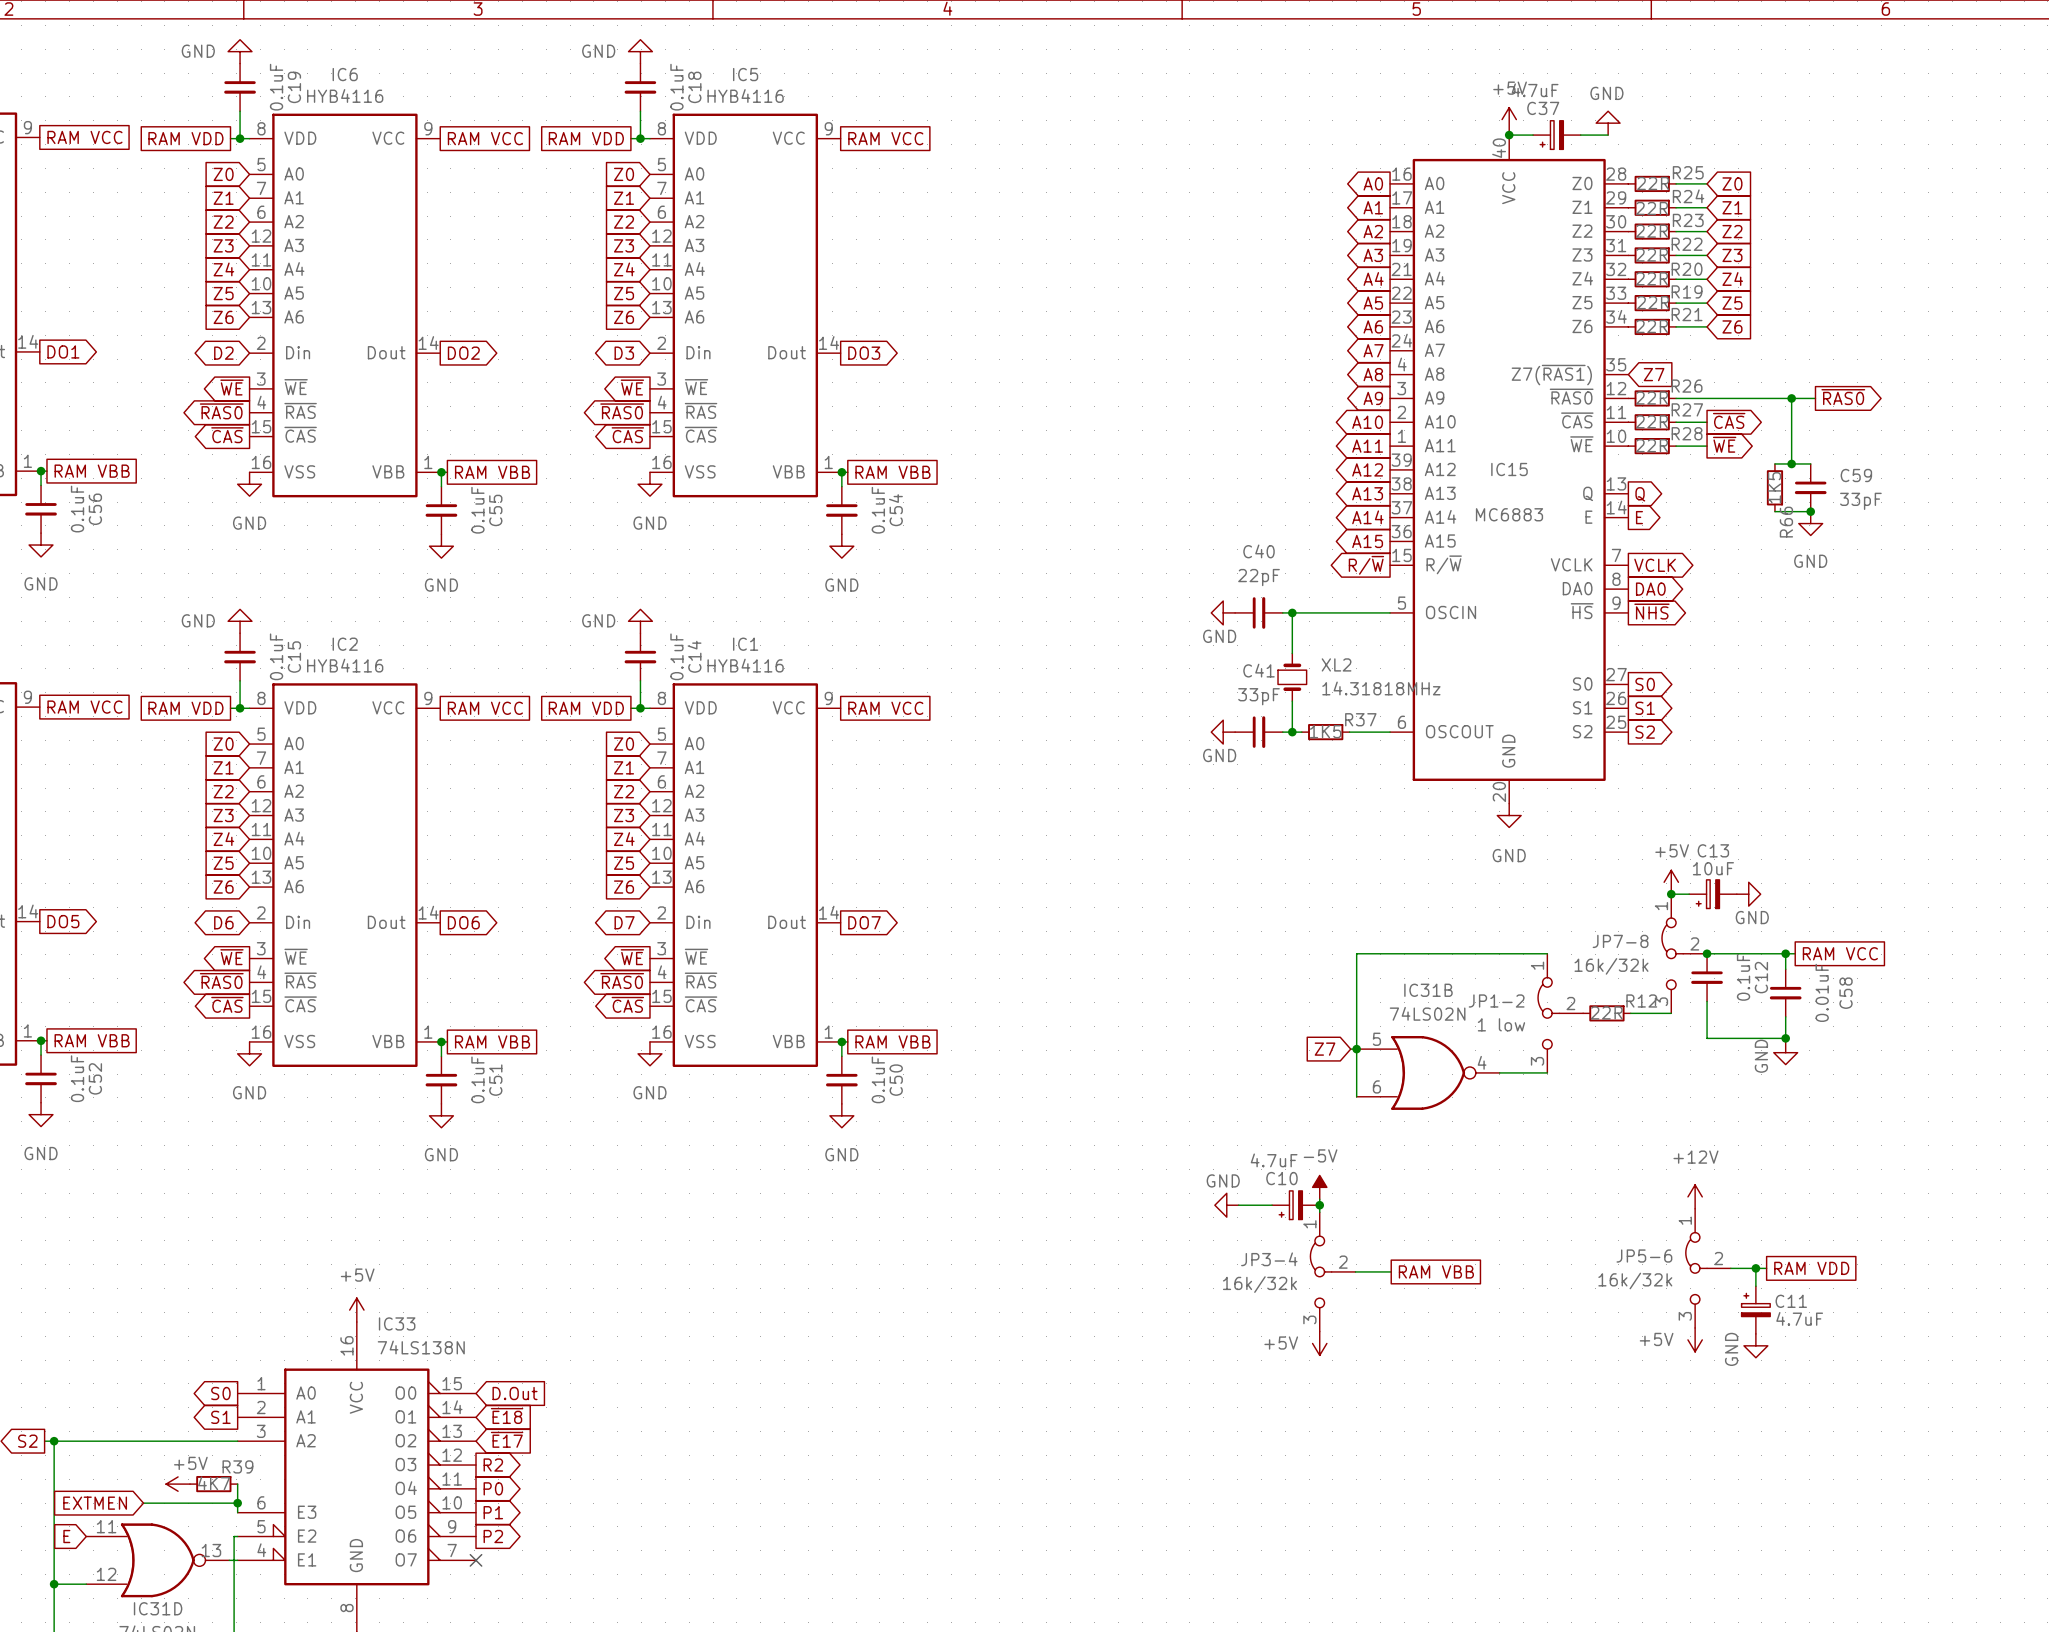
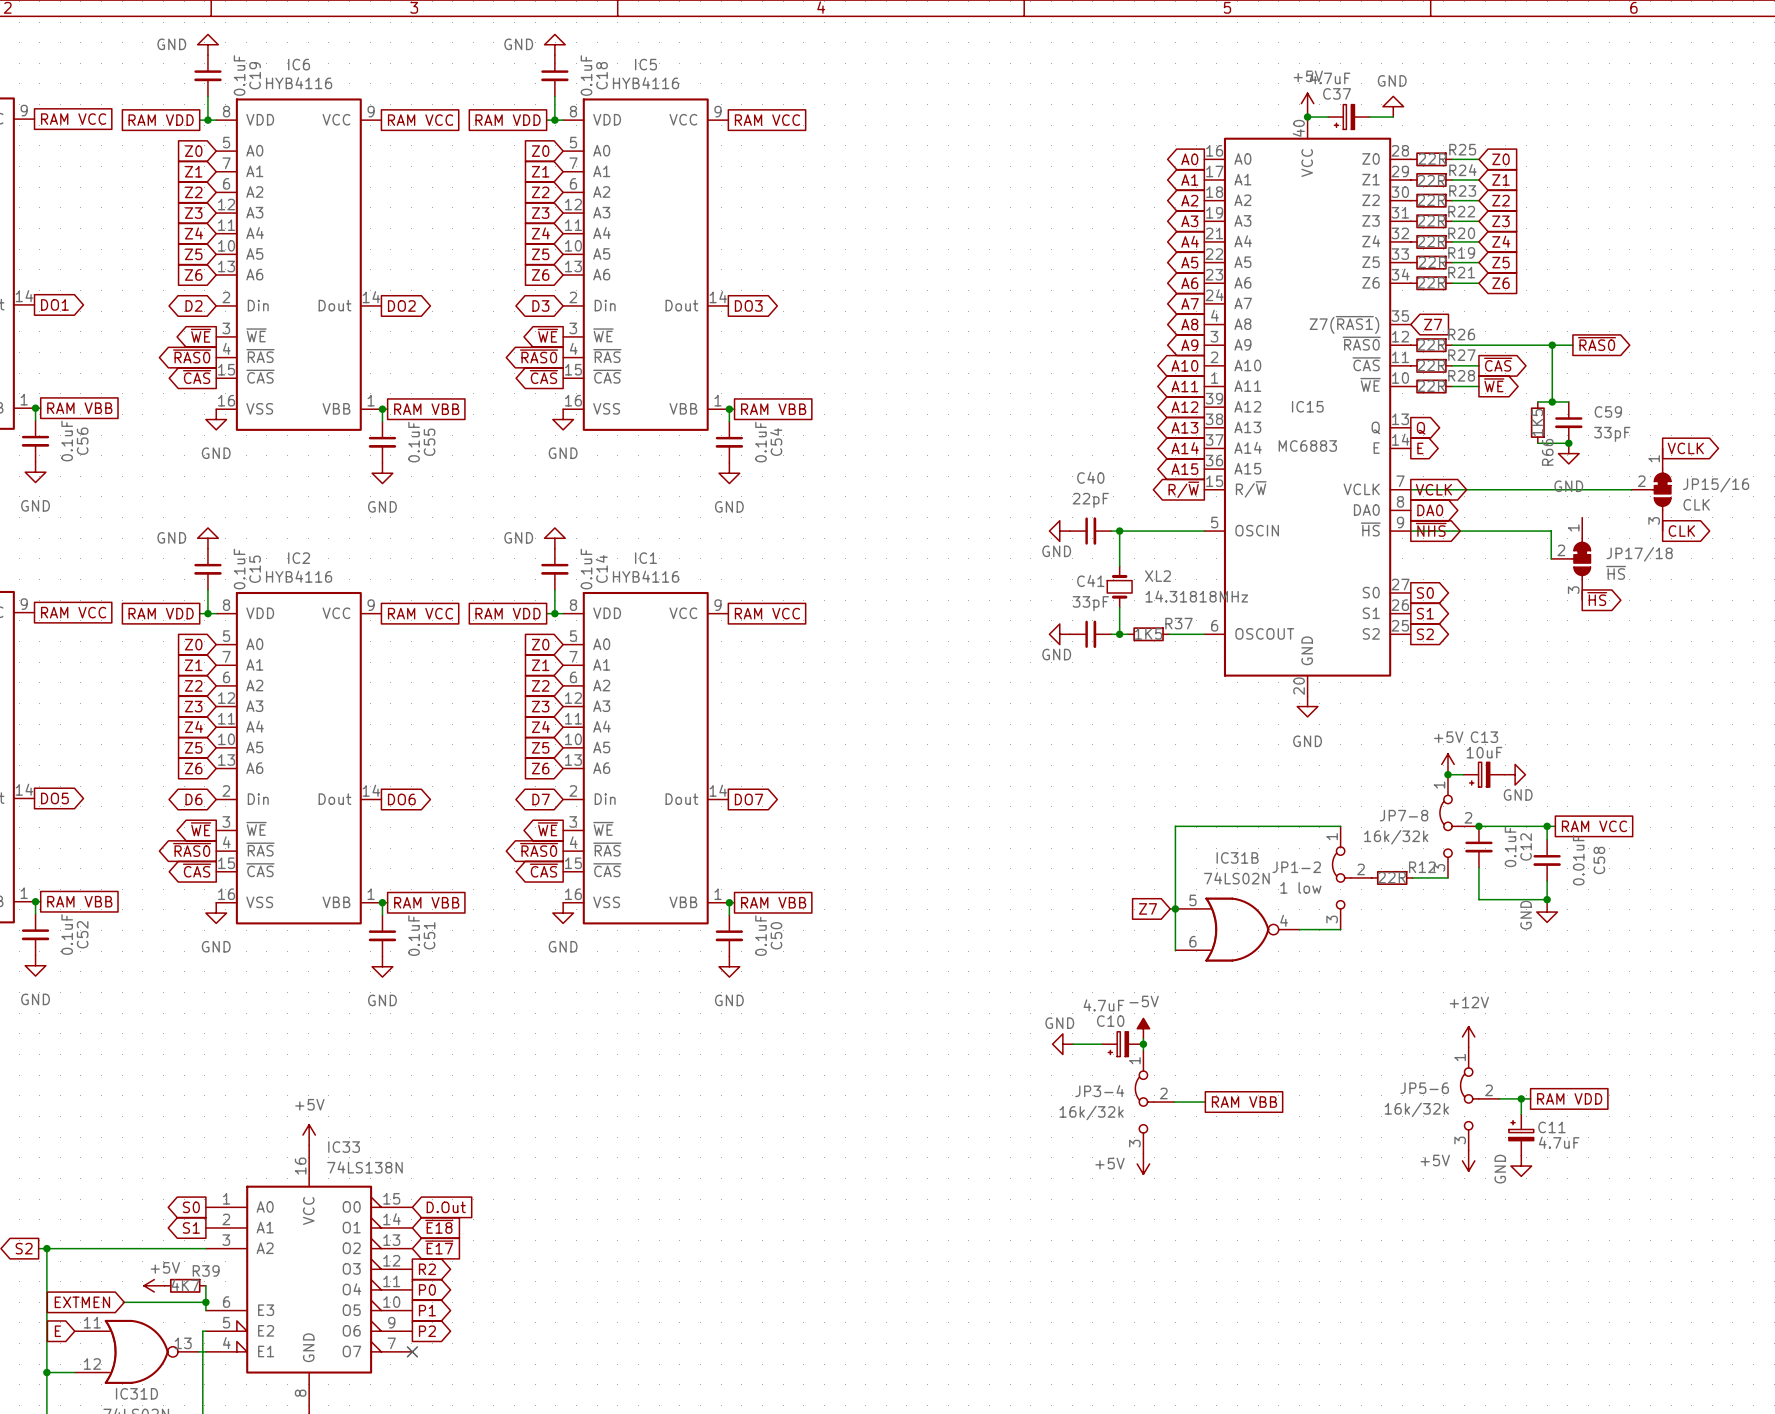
global label: none -> VCLK (1685, 448)
wire: none -> (1410, 489) (1631, 489)
JP15/16: none -> CLK (1651, 489)
wire: none -> (1410, 531) (1551, 531) (1551, 558)
global label: none -> CLK (1681, 531)
JP17/18: none -> ~{HS} (1570, 558)
global label: none -> ~{HS} (1597, 599)

